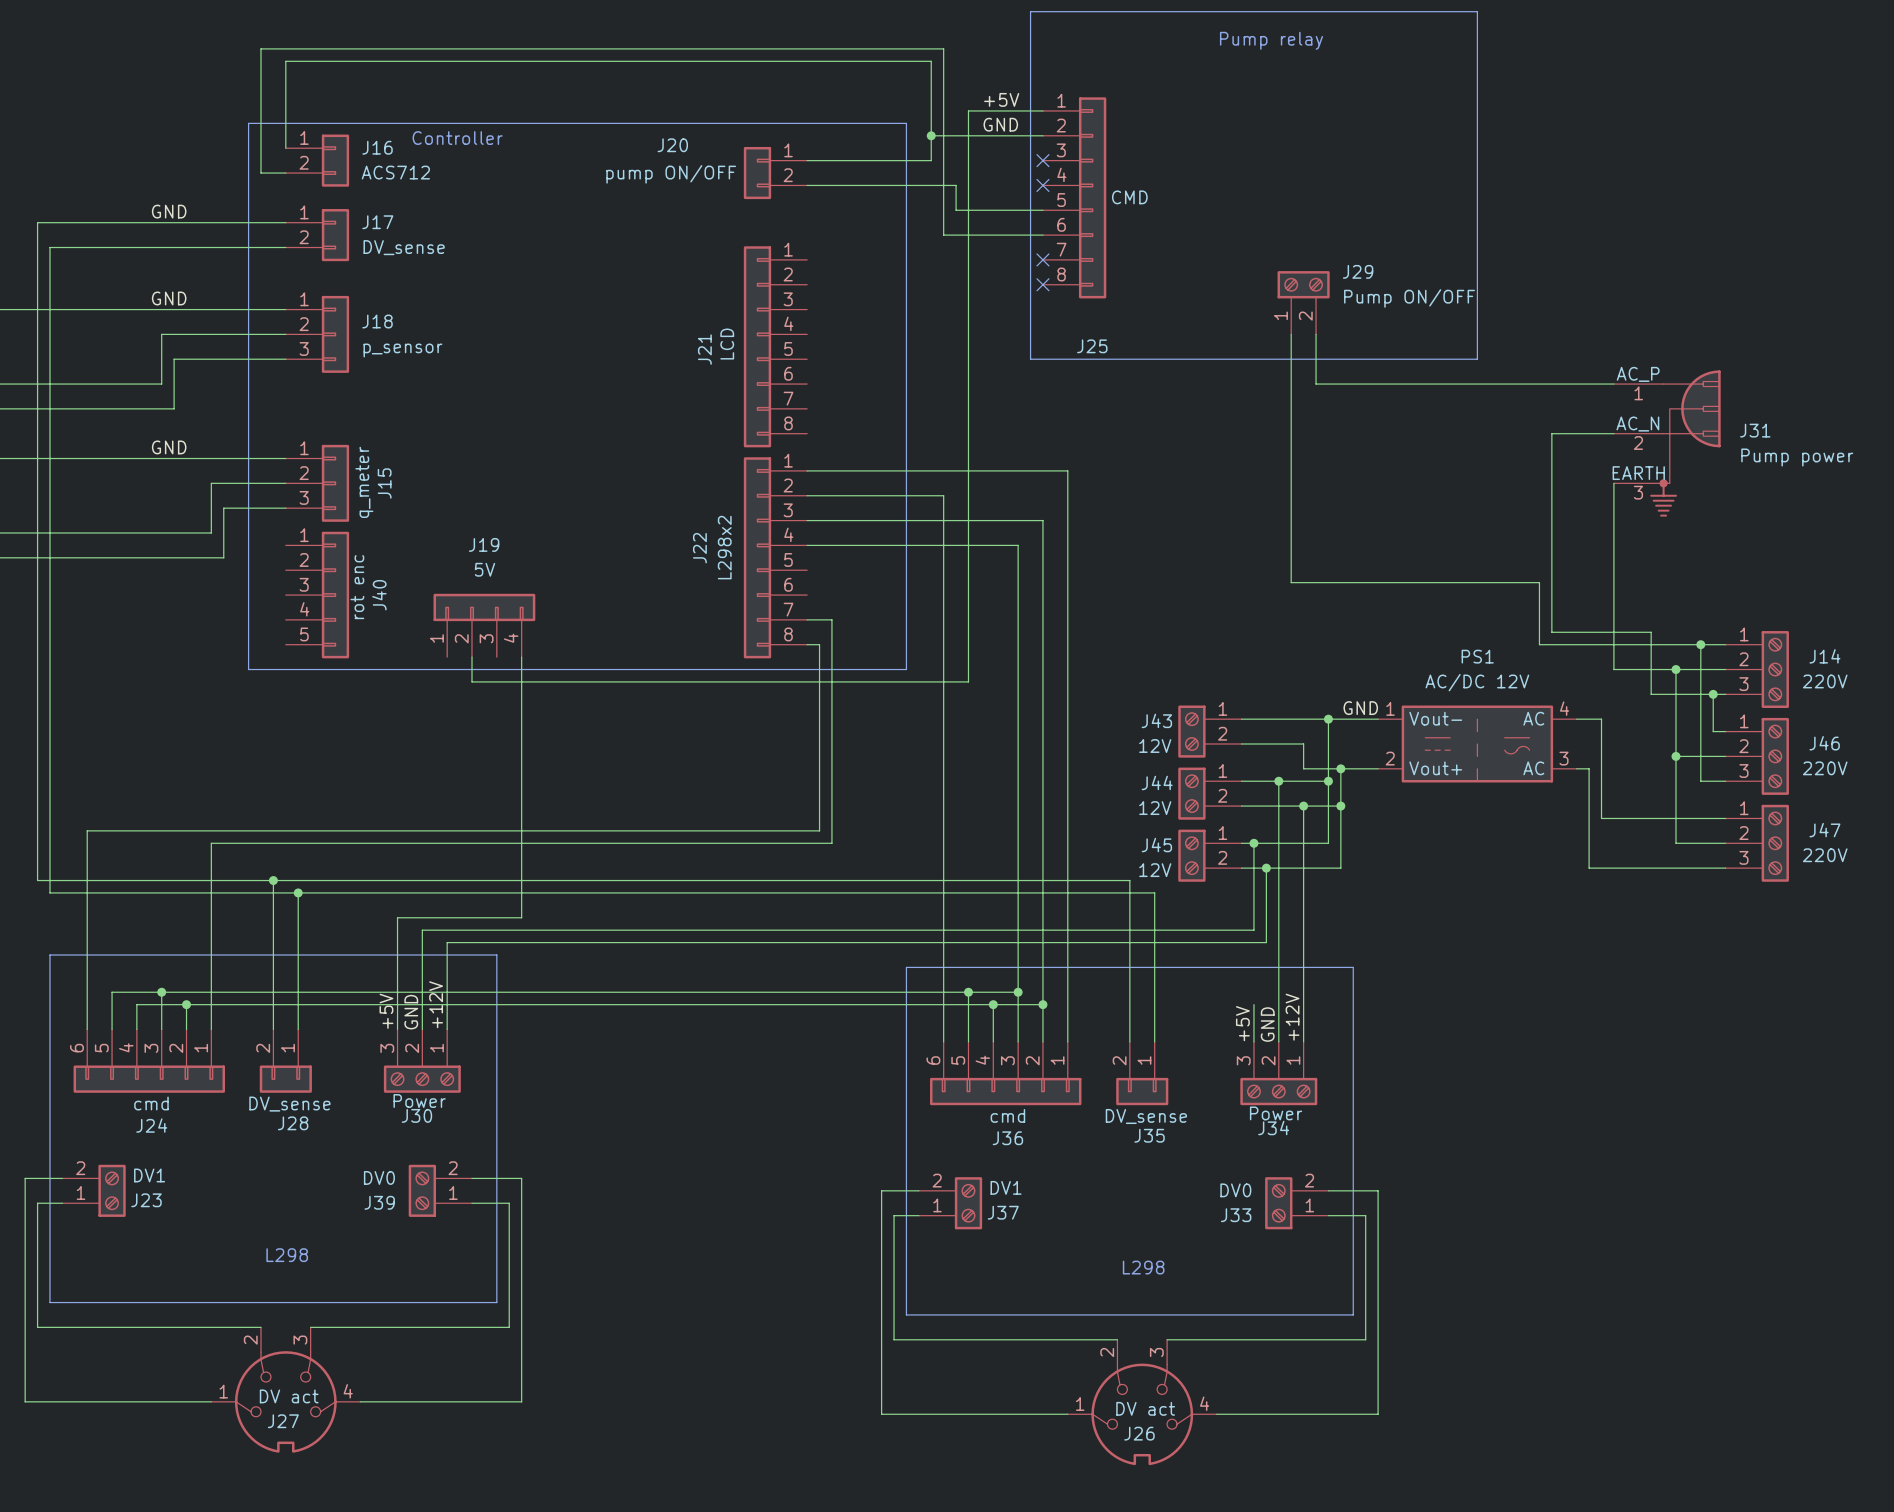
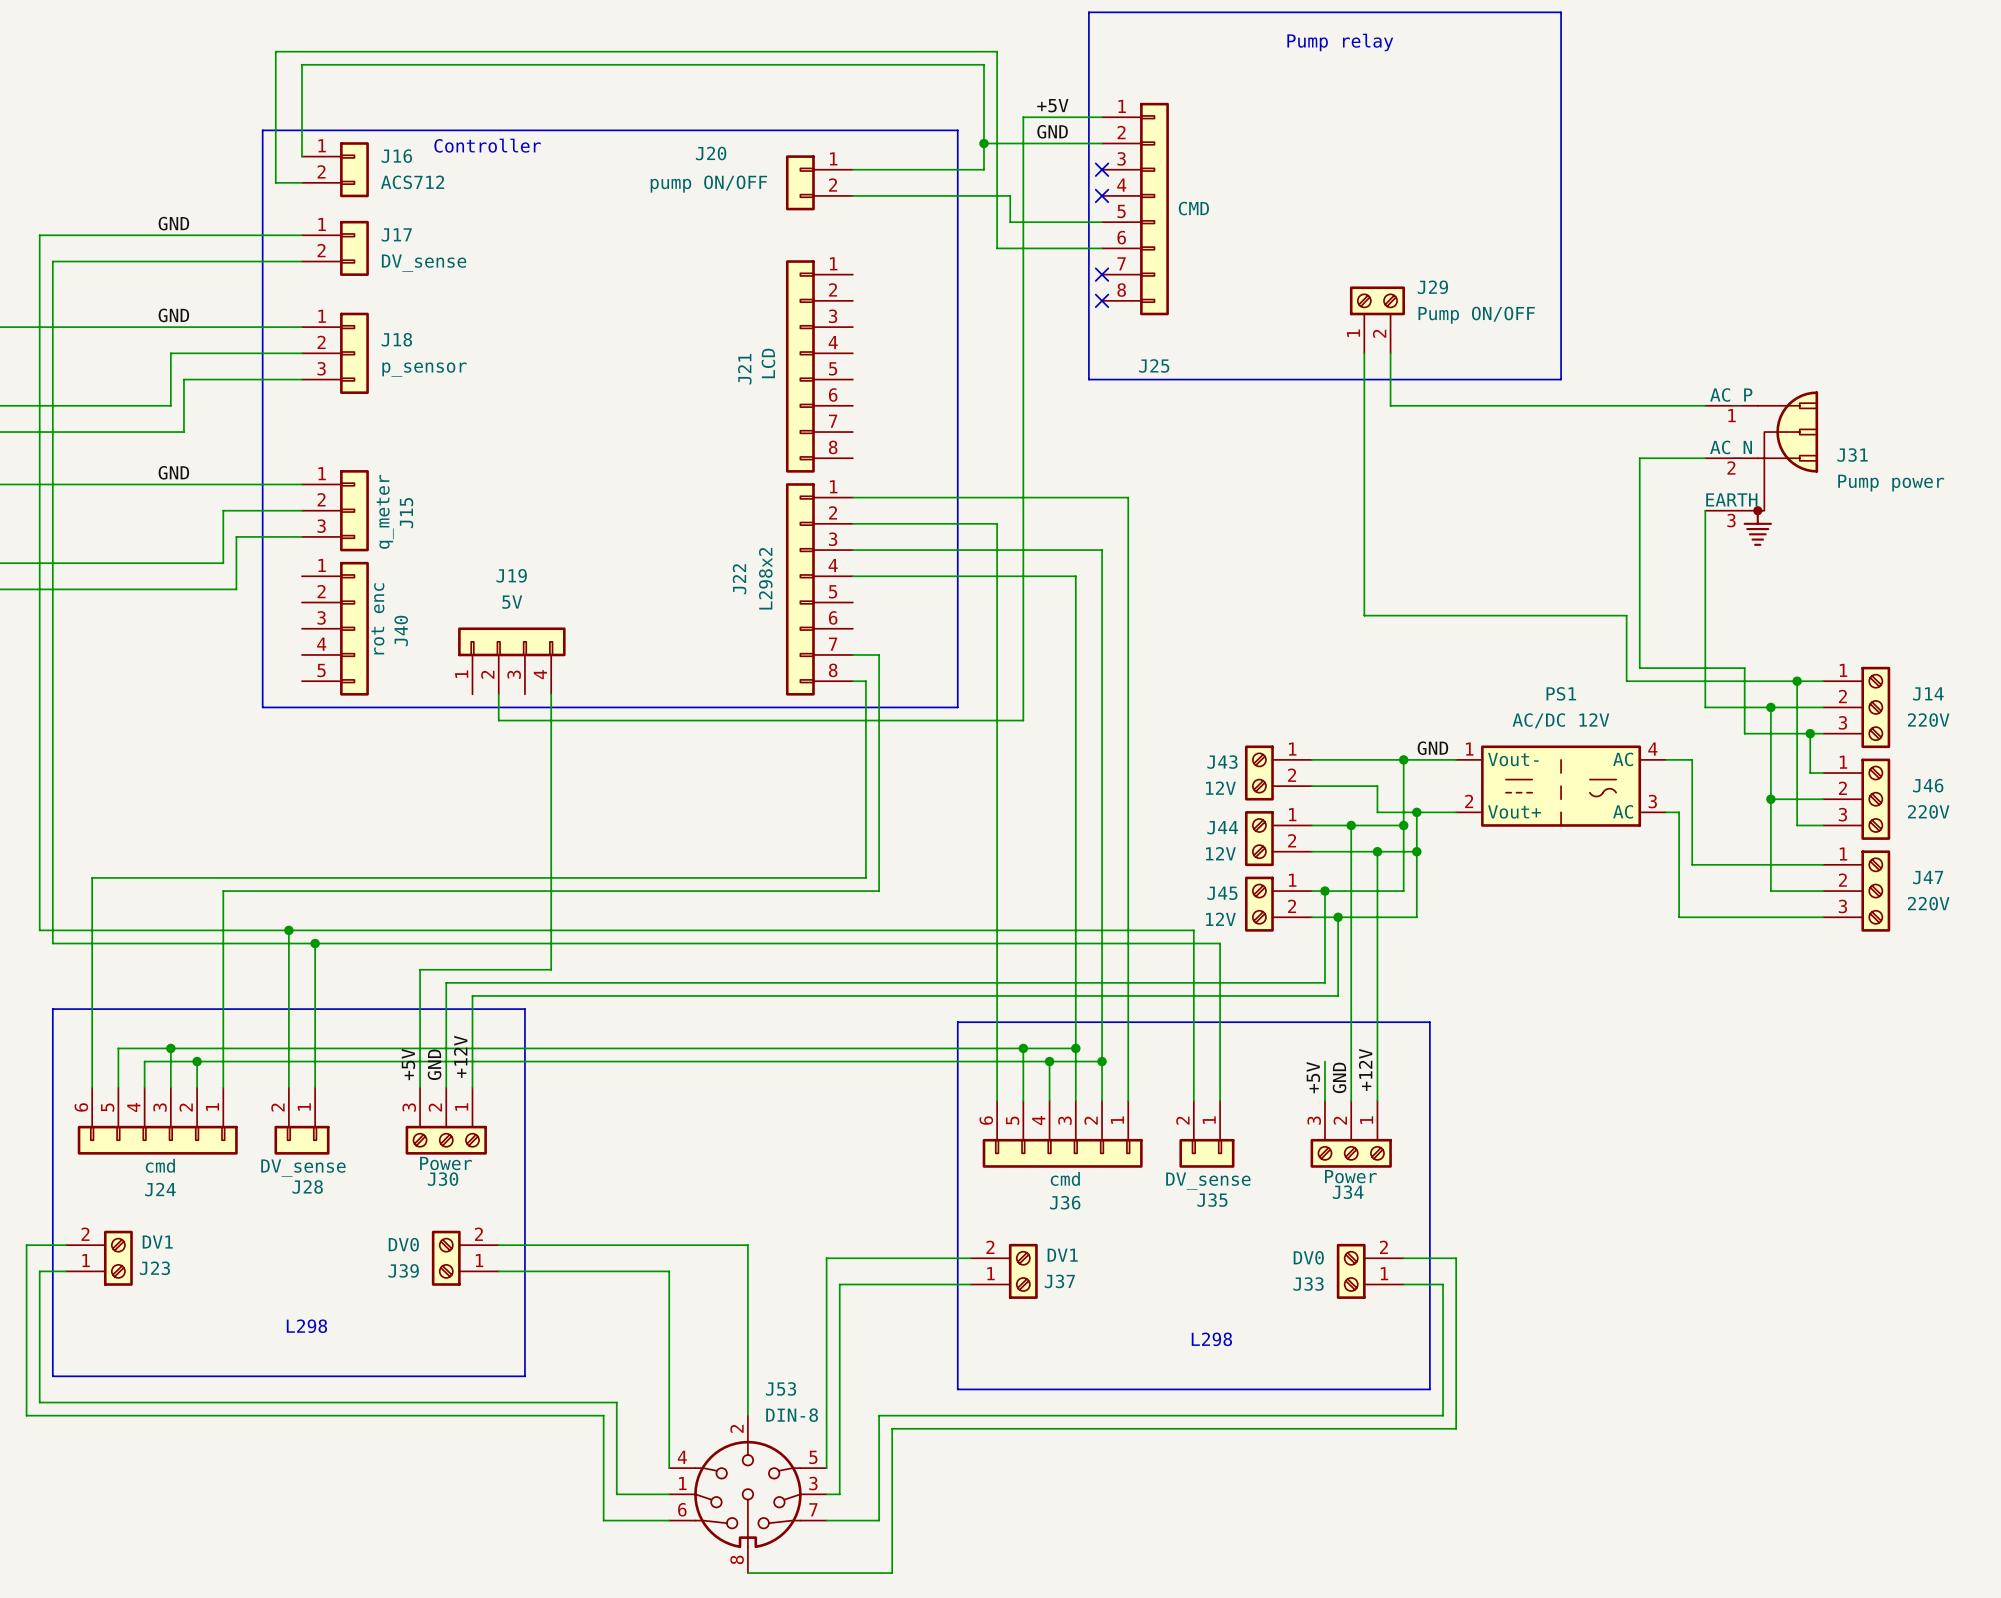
wire: (521, 1178) (521, 1401) (360, 1401) -> (551, 1245) (747, 1245) (747, 1415)
wire: (881, 1190) (881, 1414) (1067, 1414) -> (931, 1258) (826, 1258) (826, 1468)
wire: (509, 1203) (509, 1327) -> (538, 1271) (669, 1271) (669, 1468)
wire: (894, 1215) (894, 1339) -> (944, 1284) (839, 1284) (839, 1494) (826, 1494)
wire: none -> (275, 1402) (328, 1402)
wire: none -> (538, 1402) (616, 1402) (616, 1494) (669, 1494)
wire: (25, 1339) (25, 1401) (211, 1401) -> (26, 1415) (603, 1415) (603, 1520) (669, 1520)
wire: none -> (944, 1415) (879, 1415) (879, 1520) (826, 1520)
wire: none -> (1180, 1415) (1233, 1415)
wire: (1378, 1352) (1378, 1414) (1216, 1414) -> (1456, 1428) (892, 1428) (892, 1573) (747, 1573)
J27: DV act (285, 1390) -> none
J26: DV act (1142, 1402) -> none
J53: none -> DIN-8 (747, 1494)

